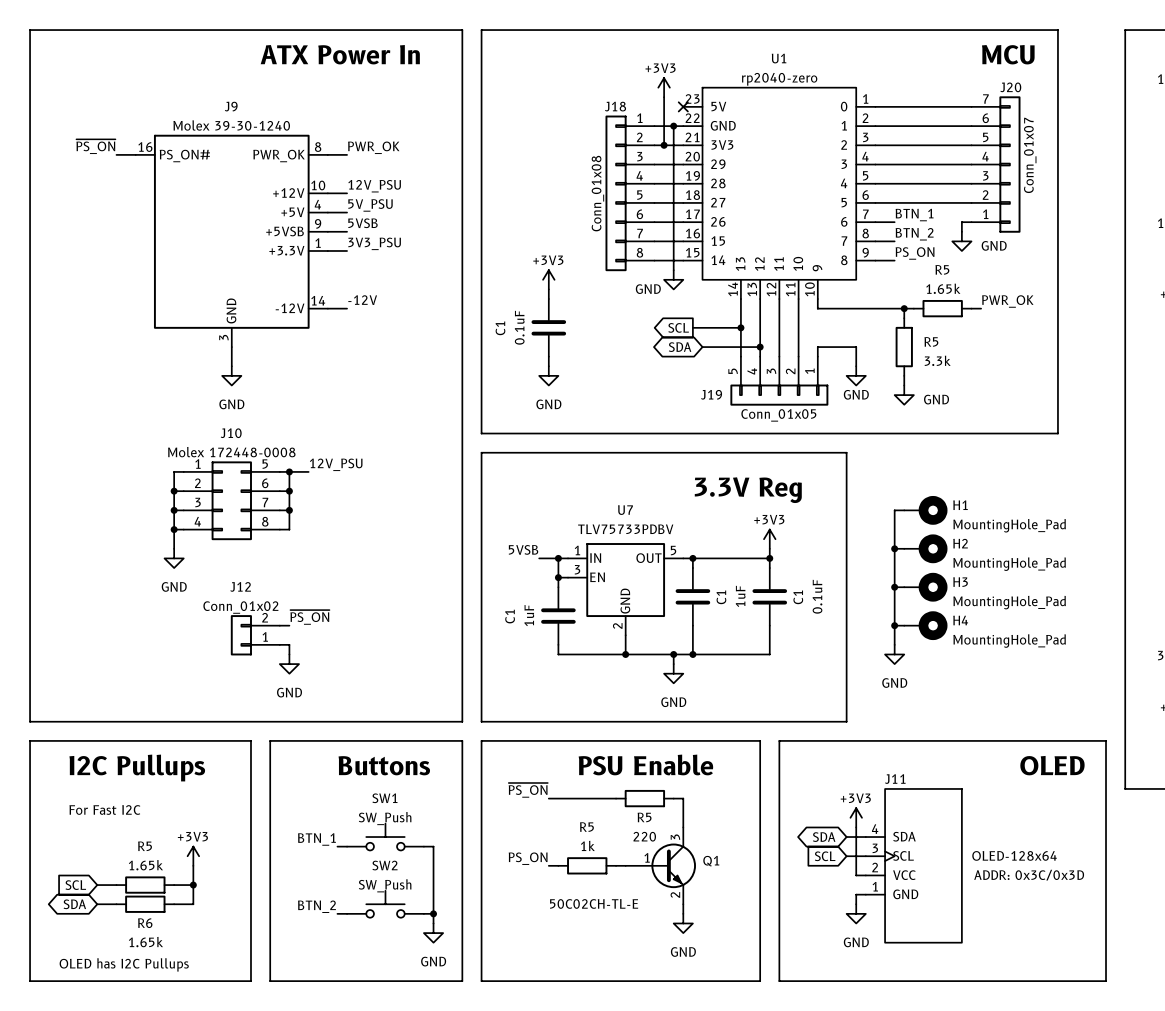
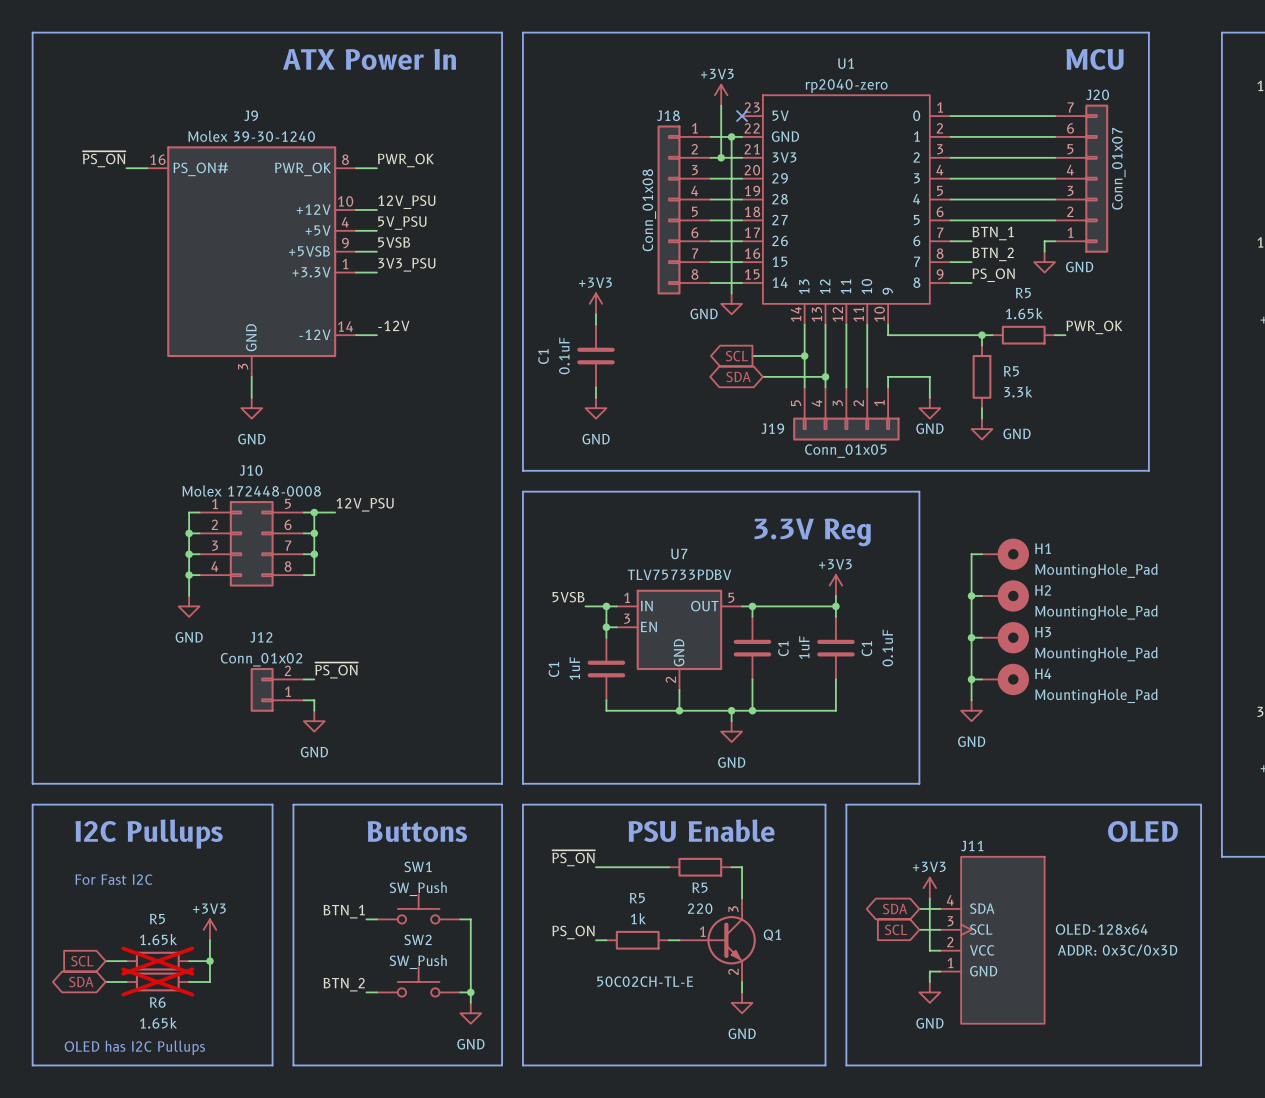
R5 do-not-place cross: none -> (157, 961)
R6 do-not-place cross: none -> (157, 981)

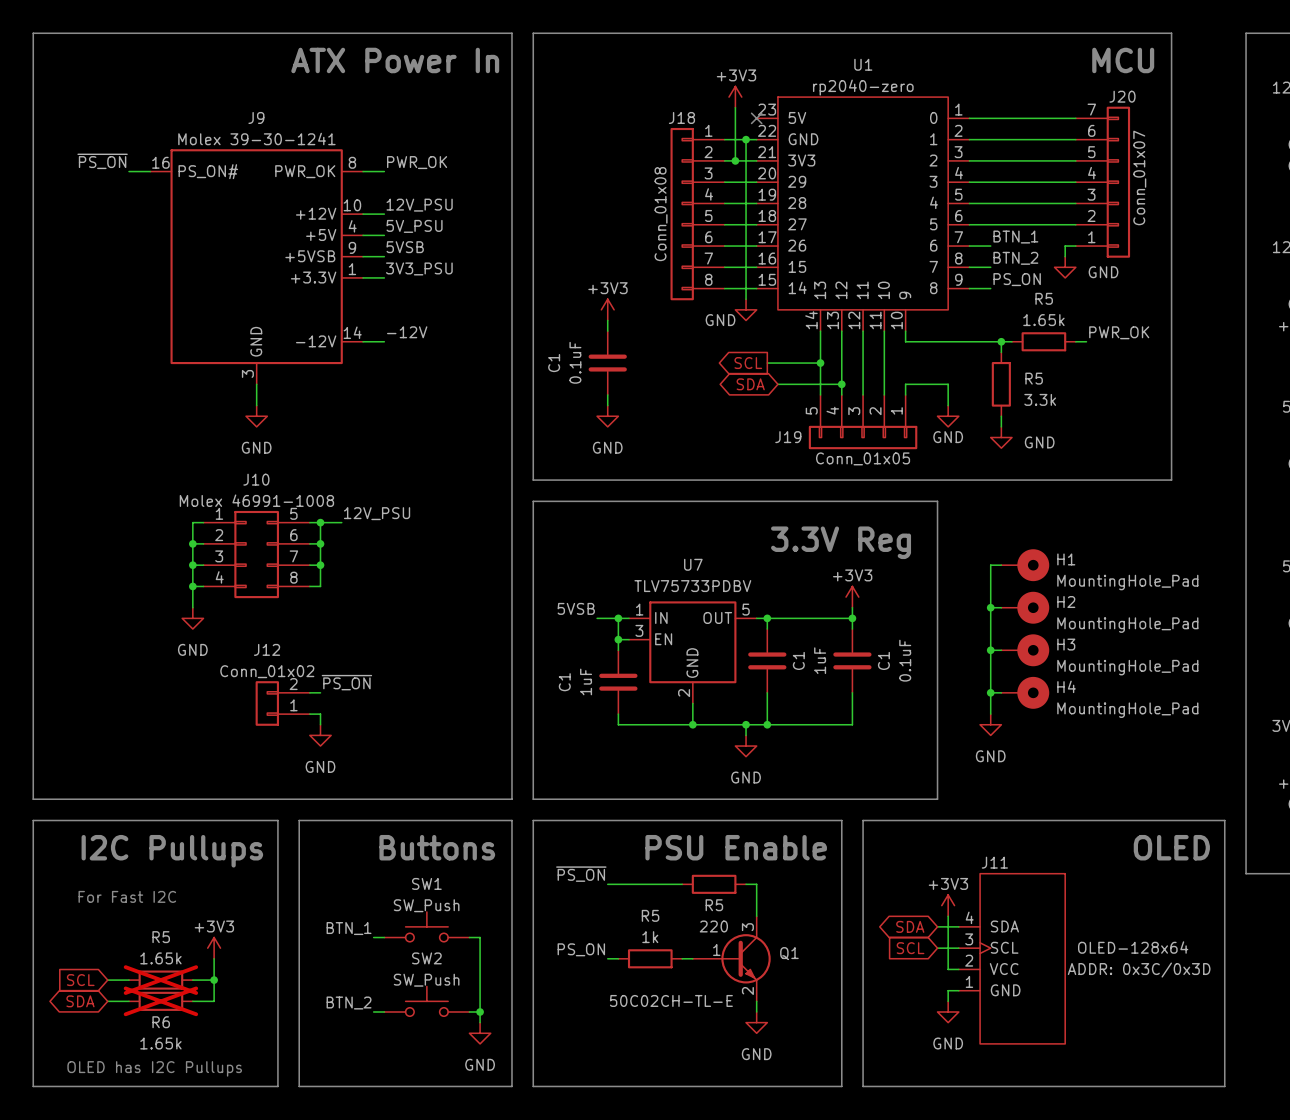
J9 value: Molex 39-30-1240 (251, 136) -> Molex 39-30-1241 (256, 138)
J10 value: Molex 172448-0008 (251, 490) -> Molex 46991-1008 (256, 500)

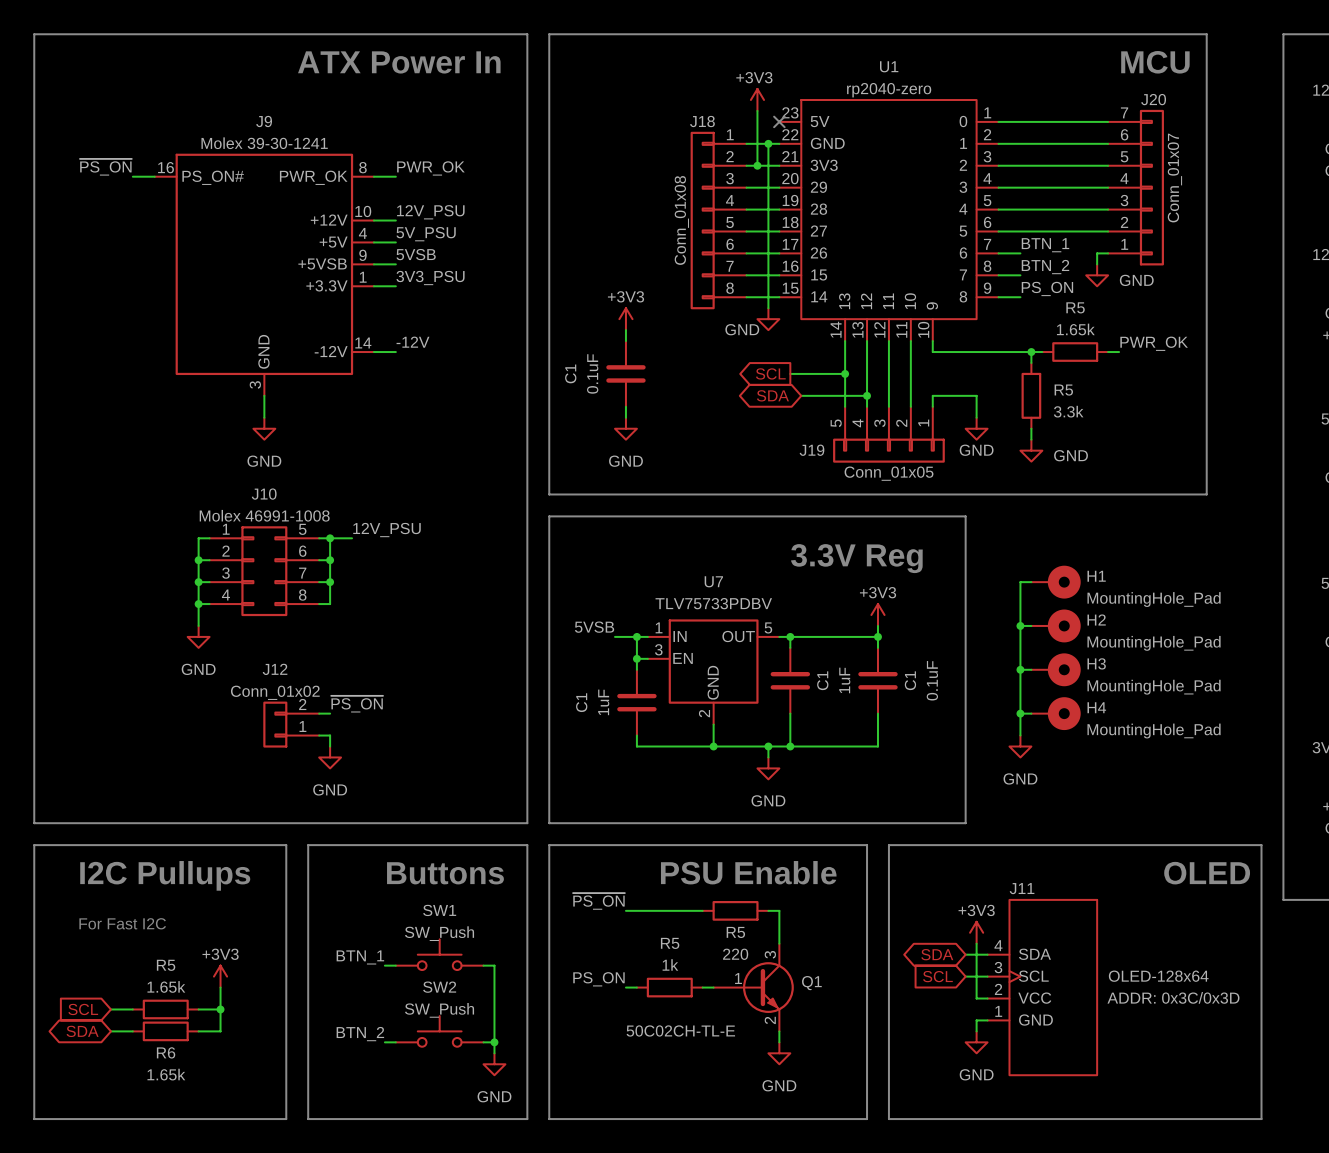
R5 do-not-place cross: (160, 980) -> none
R6 do-not-place cross: (160, 1001) -> none
text: OLED has I2C Pullups (154, 1068) -> none

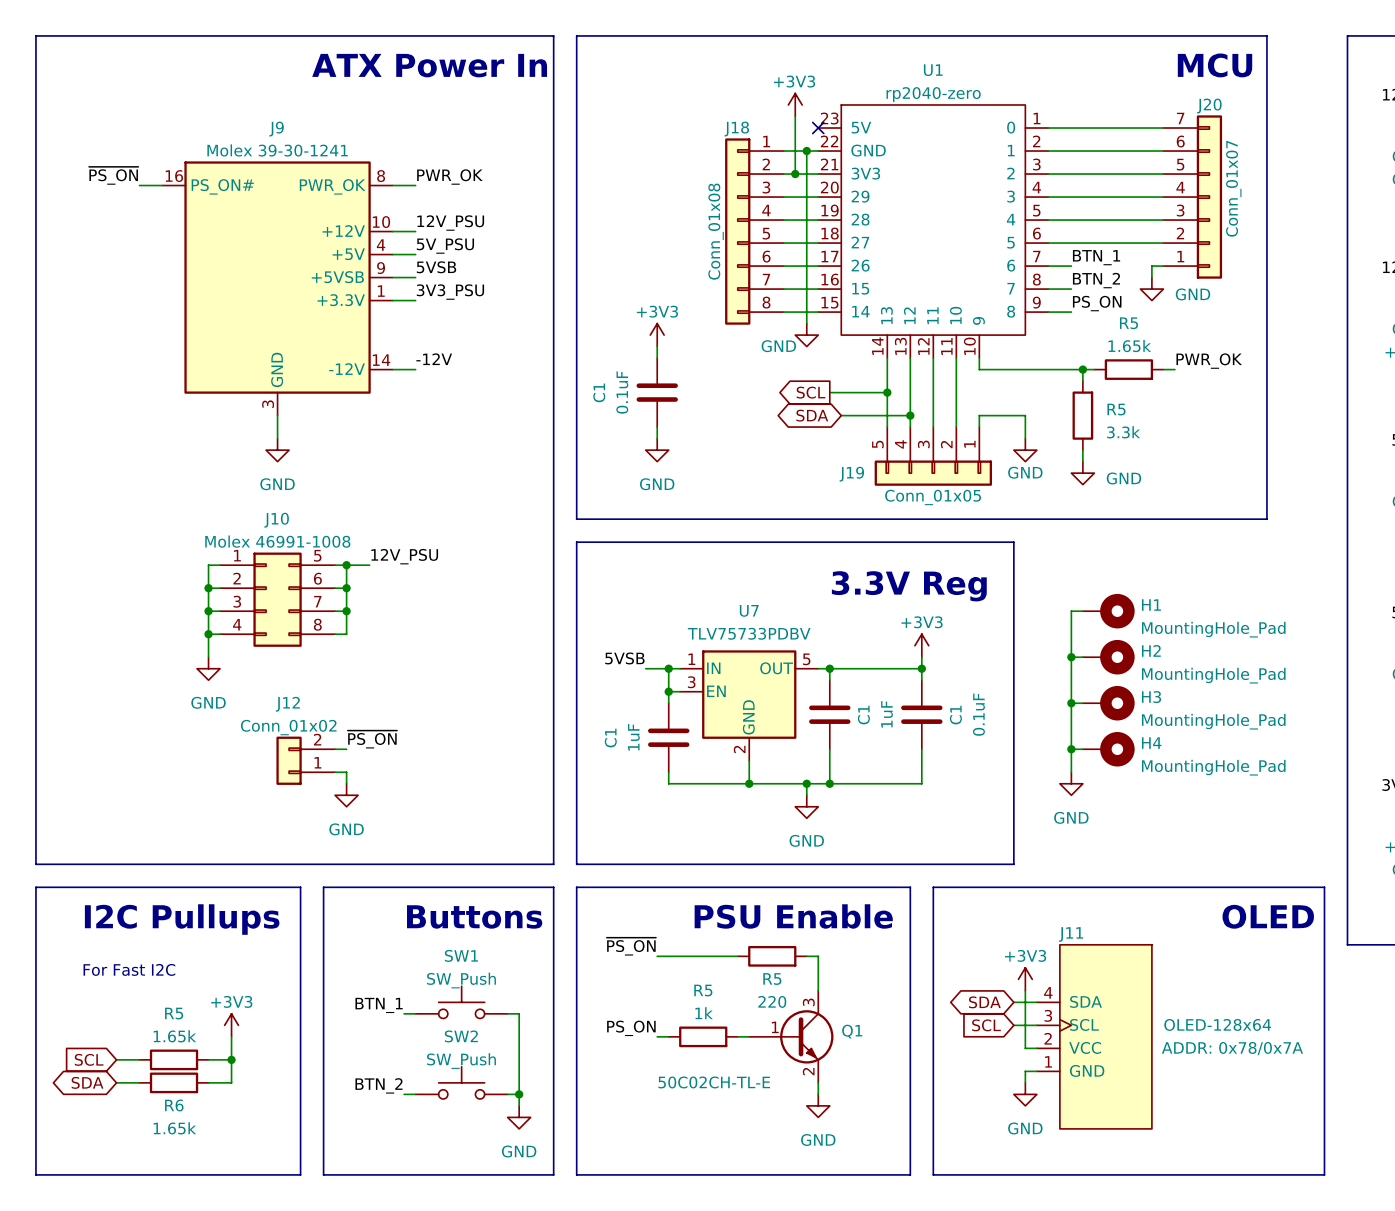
J11 text: ADDR: 0x3C/0x3D (1173, 997) -> ADDR: 0x78/0x7A (1232, 1048)

